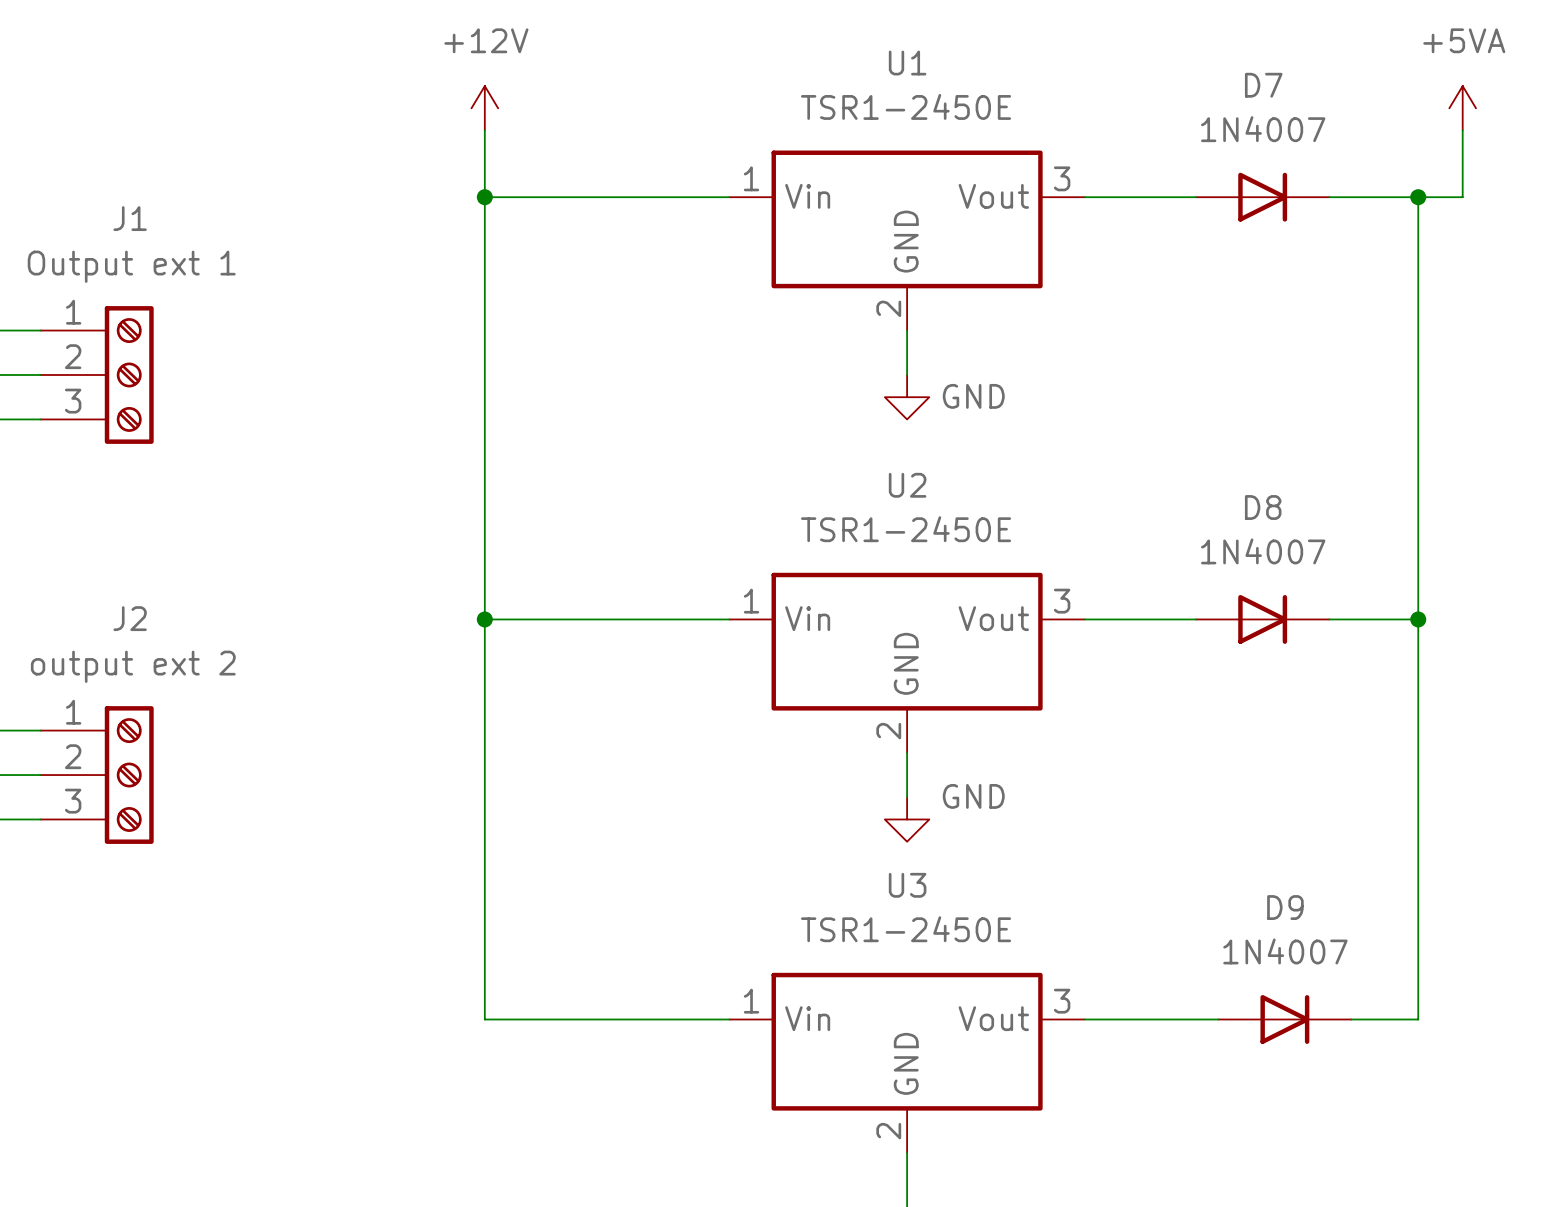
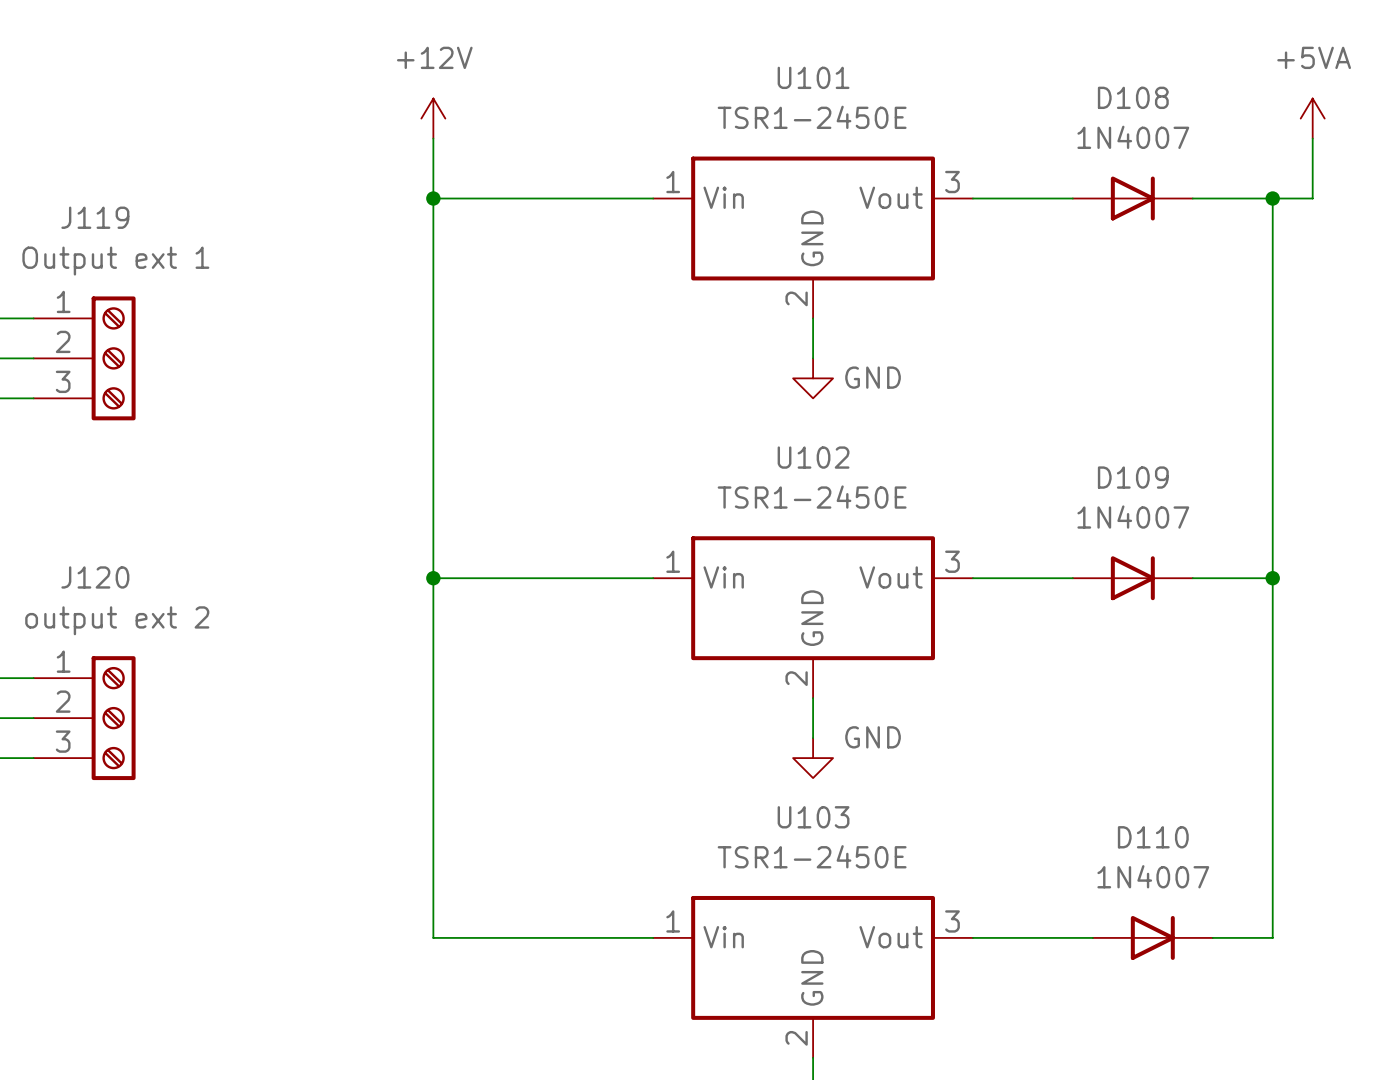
U1 name: U1 (907, 63) -> U101 (813, 77)
D7 name: D7 (1263, 85) -> D108 (1133, 97)
J1 name: J1 (130, 218) -> J119 (95, 217)
U2 name: U2 (907, 485) -> U102 (813, 457)
D8 name: D8 (1263, 507) -> D109 (1133, 477)
J2 name: J2 (130, 618) -> J120 (95, 577)
U3 name: U3 (907, 885) -> U103 (813, 817)
D9 name: D9 (1285, 907) -> D110 (1153, 837)

